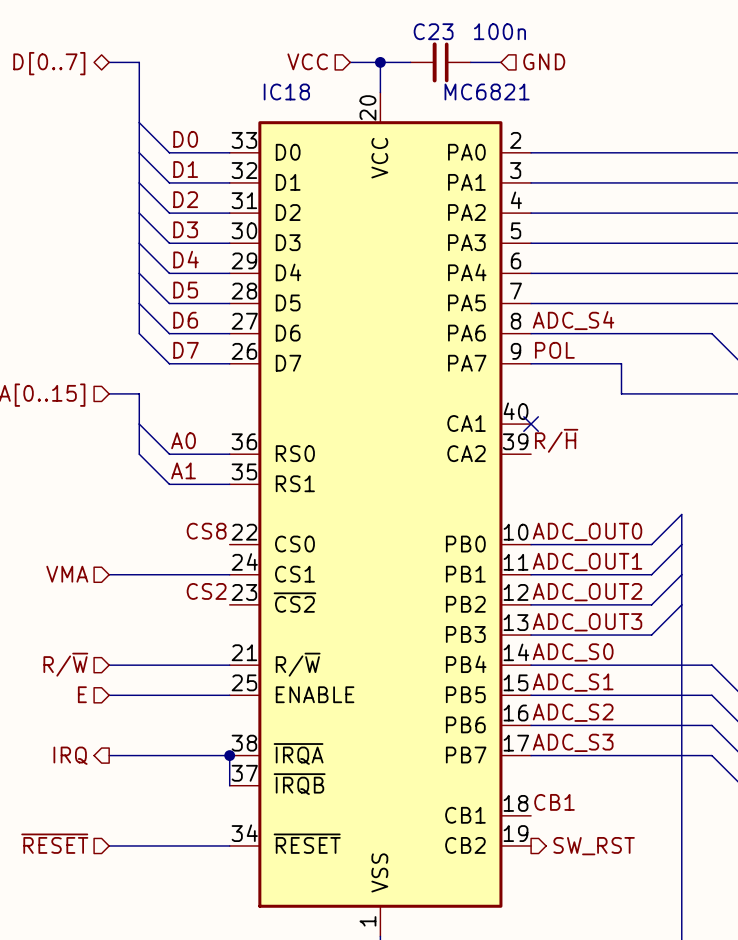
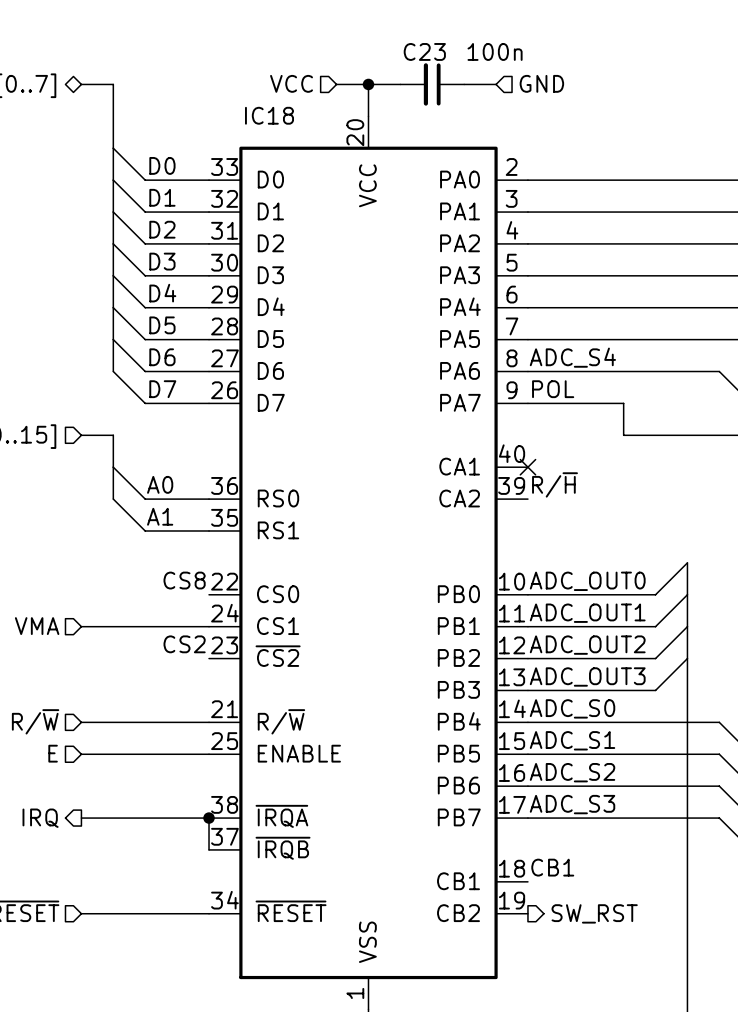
IC18 value: MC6821 (487, 91) -> none

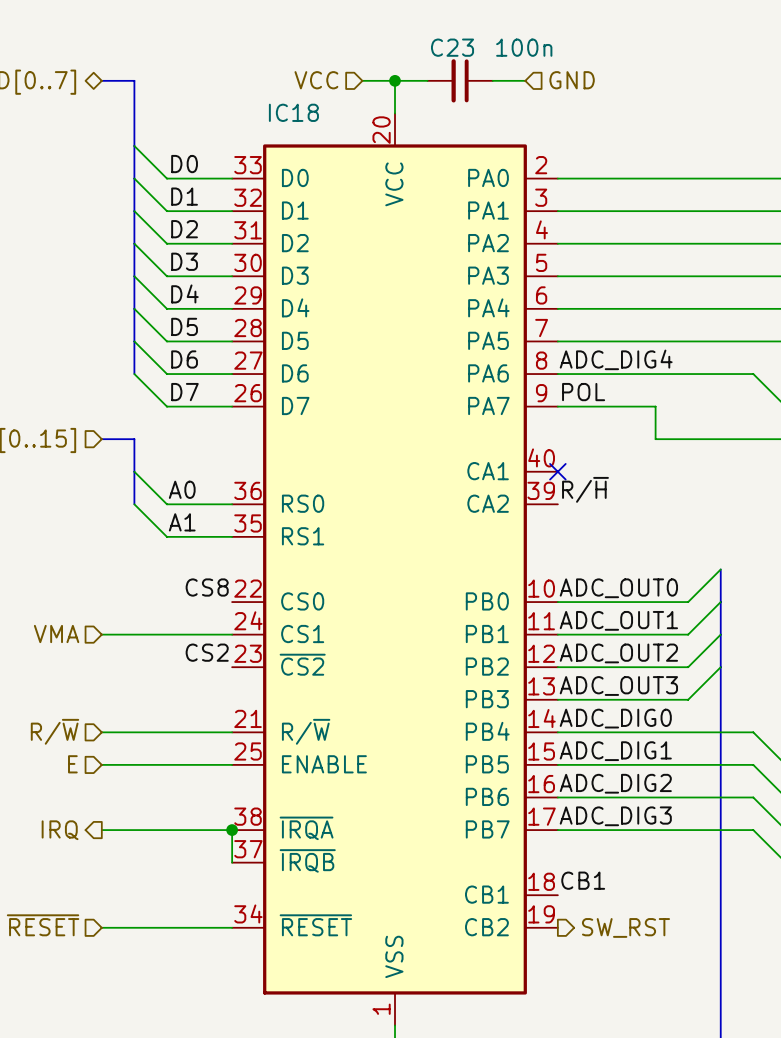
label: ADC_S4 (572, 357) -> ADC_DIG4 (616, 359)
label: ADC_S0 (572, 708) -> ADC_DIG0 (615, 718)
label: ADC_S1 (572, 740) -> ADC_DIG1 (615, 751)
label: ADC_S2 (572, 772) -> ADC_DIG2 (615, 783)
label: ADC_S3 (572, 804) -> ADC_DIG3 (615, 816)

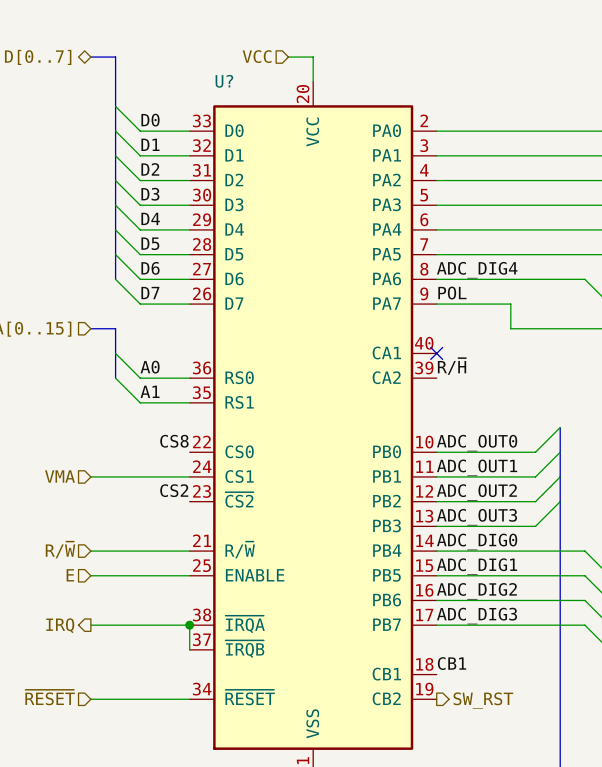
wire: (395, 80) (427, 80) -> none
junction: (395, 80) -> none
C23: 100n (460, 80) -> none
wire: (492, 80) (525, 80) -> none
hierarchical label: GND (572, 80) -> none
IC18 name: IC18 (293, 112) -> U? (224, 81)

